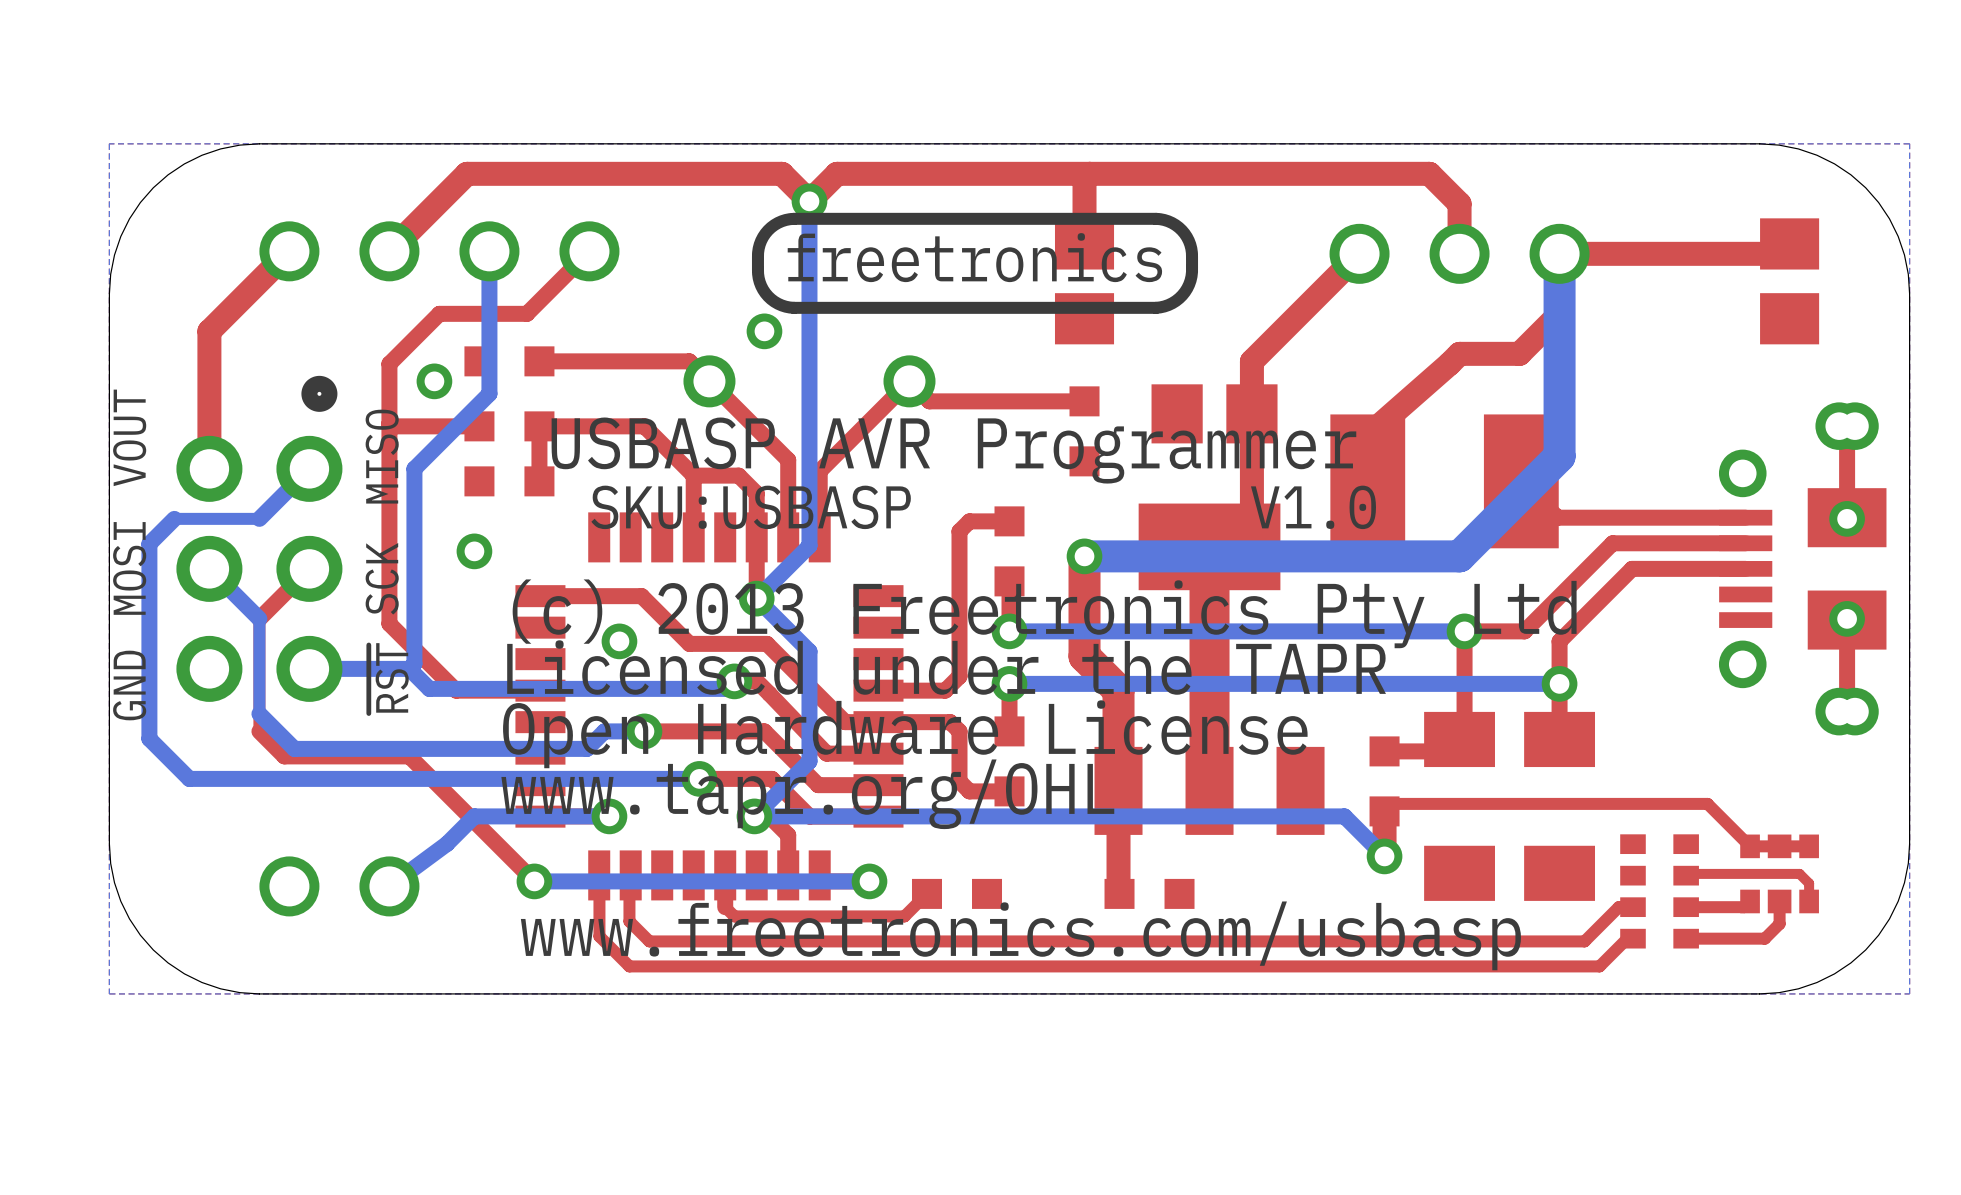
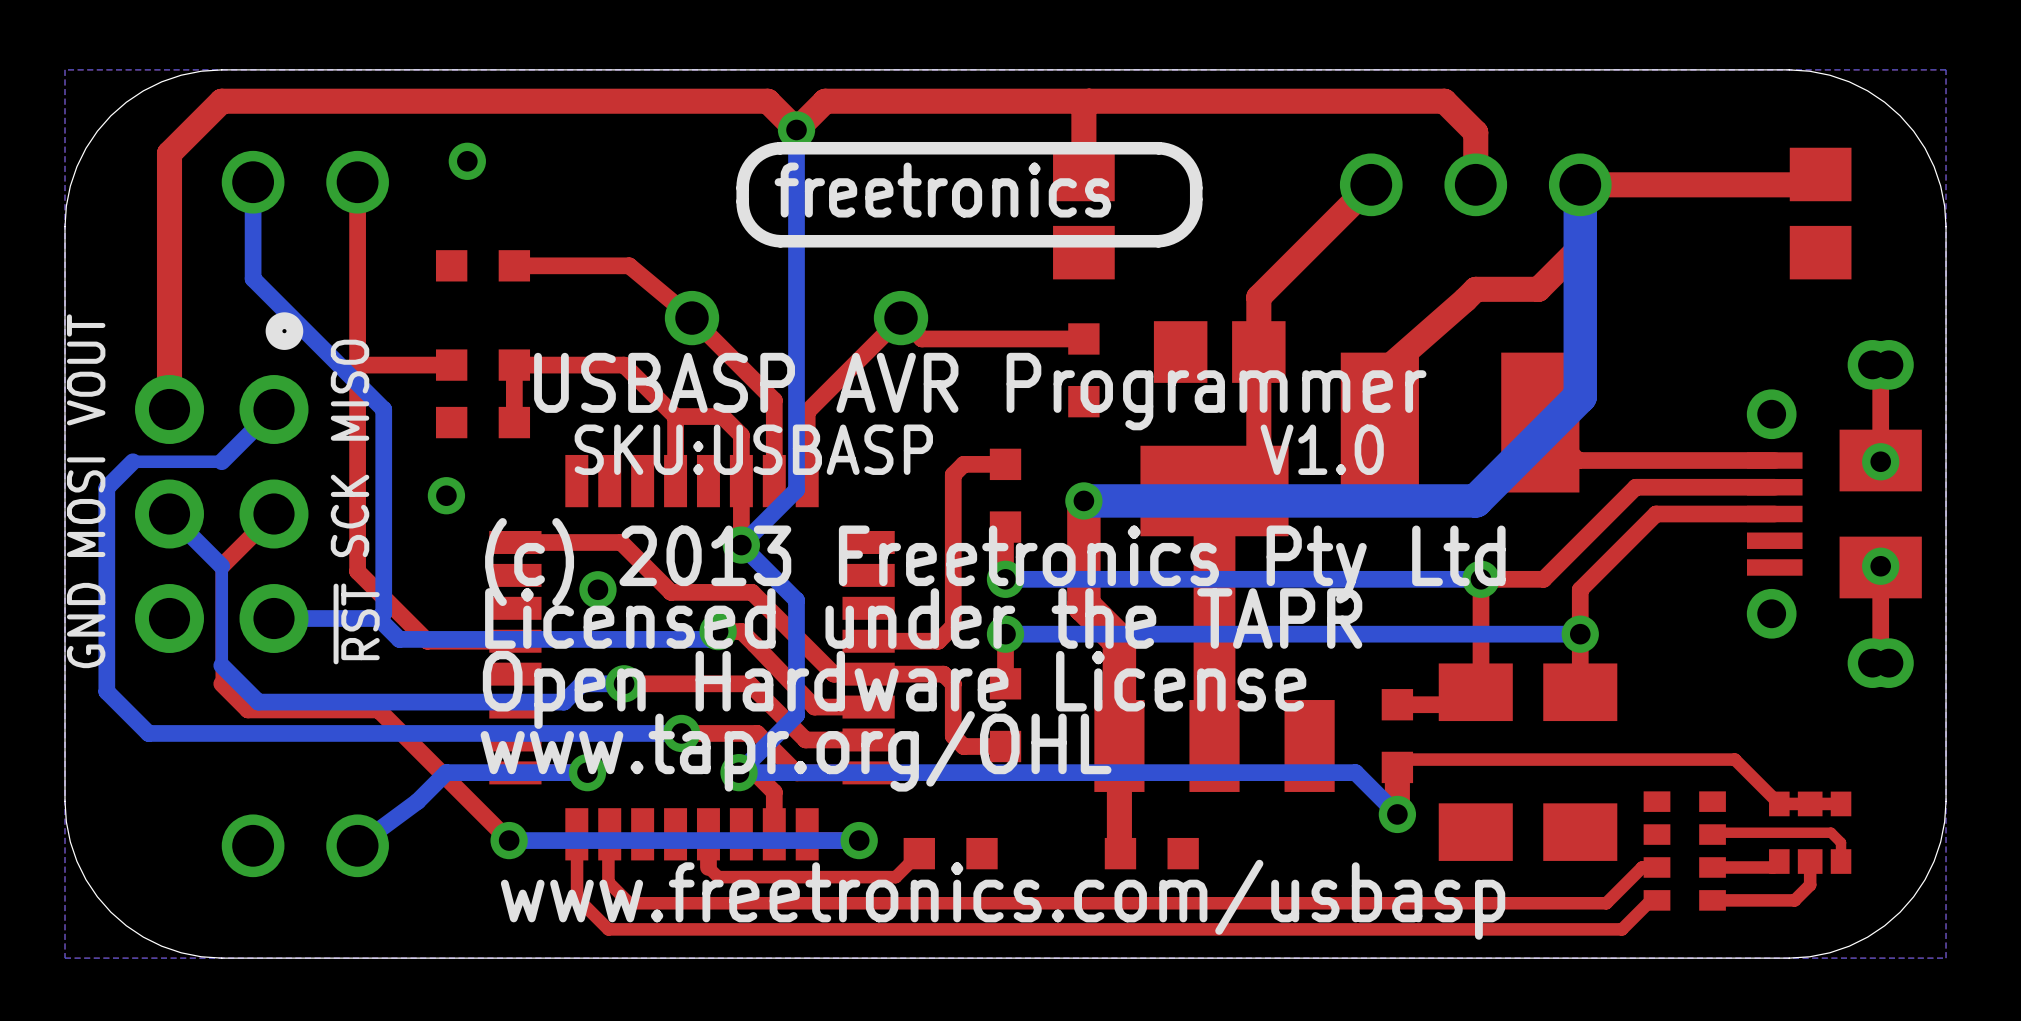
top track: (466, 173) (389, 251) -> none
via: none -> (467, 161)
top track: (289, 251) (209, 331) -> (438, 101) (221, 101) (169, 153) (169, 265)
bottom track: (489, 251) (489, 393) (414, 468) -> (253, 182) (253, 278) (383, 409)
part: (539, 251) -> none
top track: (589, 251) (526, 313) (439, 313) (389, 363) -> (357, 182) (357, 299)
via: (764, 331) -> none
part position: (509, 361) -> (483, 265)
top track: (539, 361) (689, 361) (709, 381) -> (514, 265) (629, 265) (692, 318)
via: (434, 381) -> none

